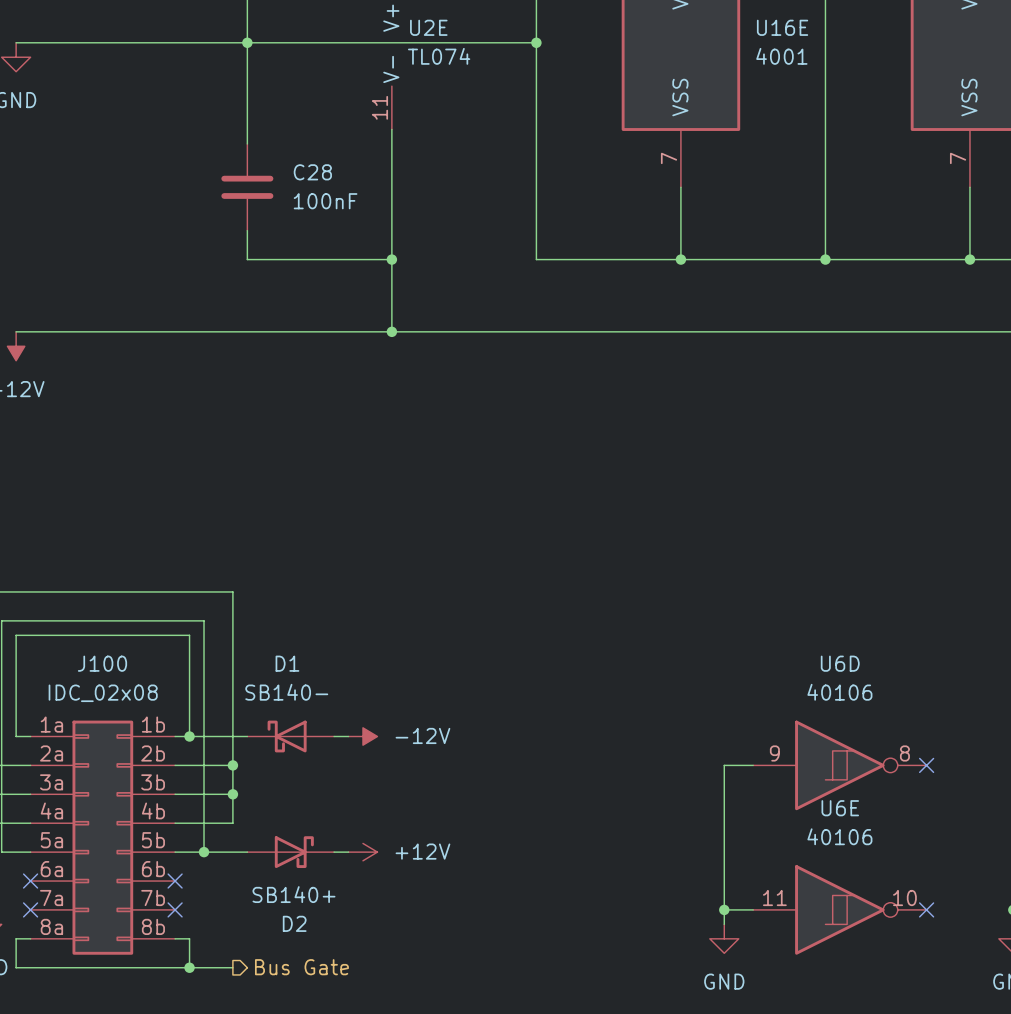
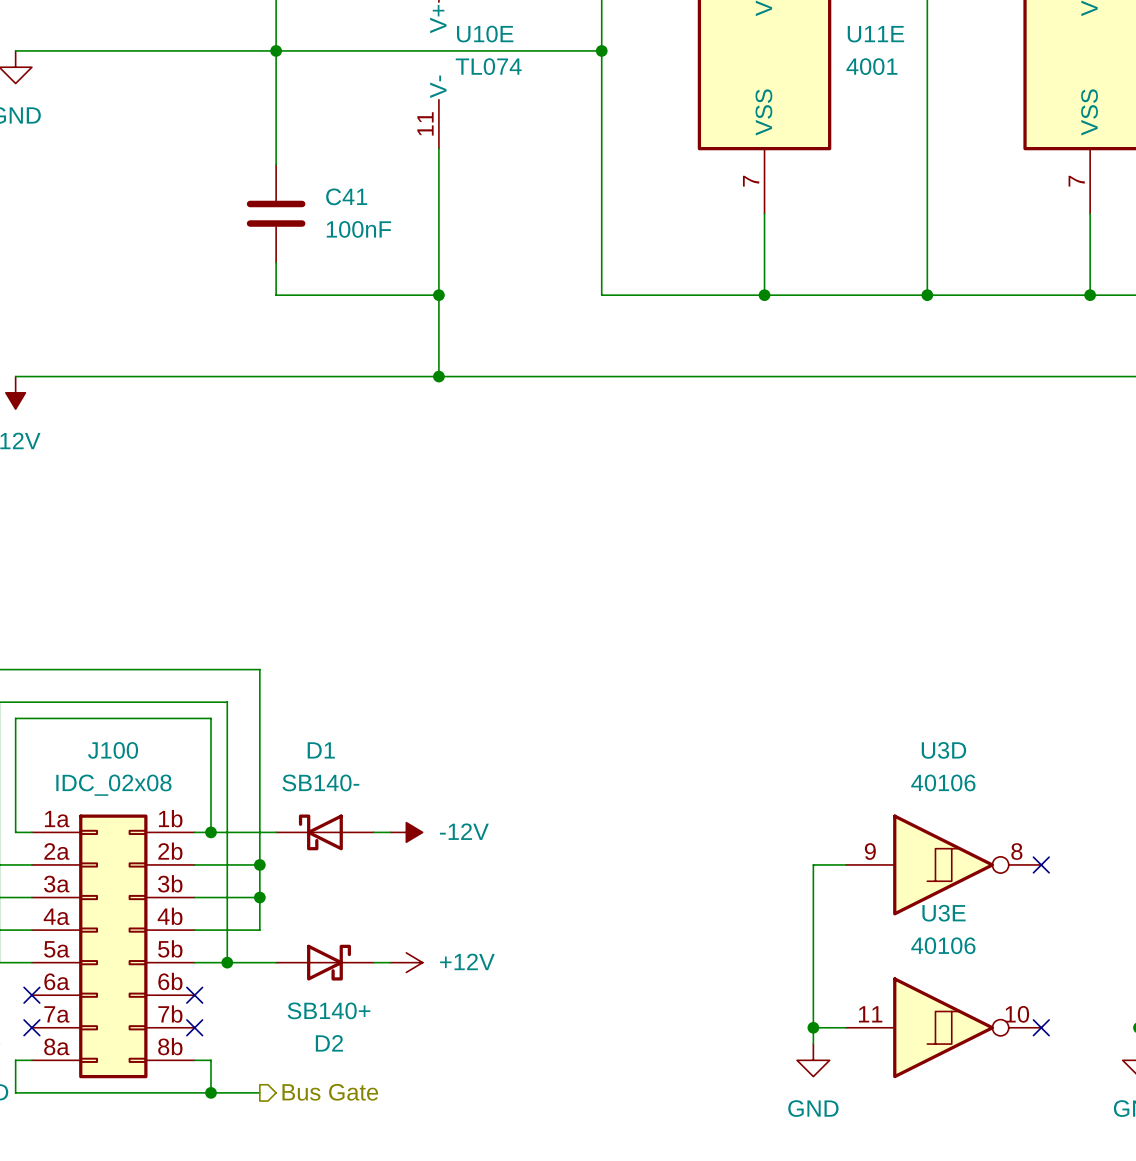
U2E name: U2E (428, 27) -> U10E (485, 34)
U16E name: U16E (782, 27) -> U11E (875, 34)
C28 name: C28 (312, 172) -> C41 (346, 196)
U6D name: U6D (840, 663) -> U3D (943, 750)
U6E name: U6E (840, 808) -> U3E (944, 913)

